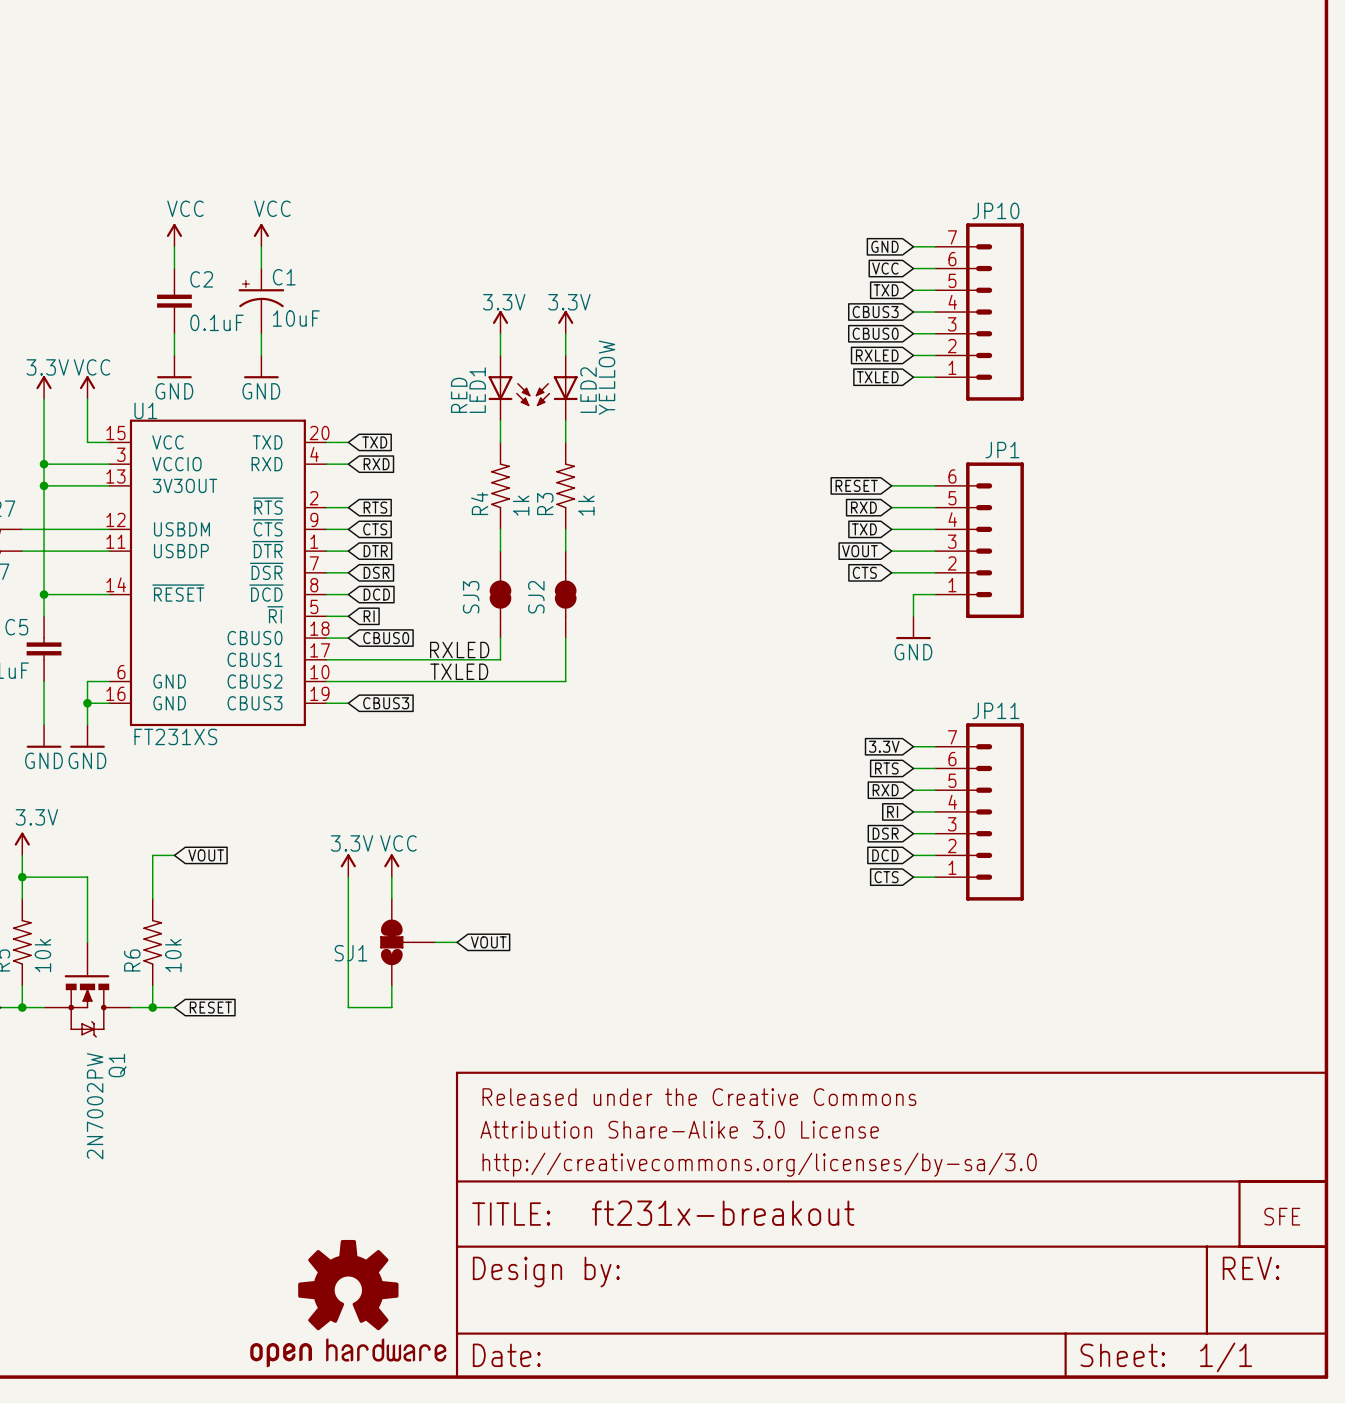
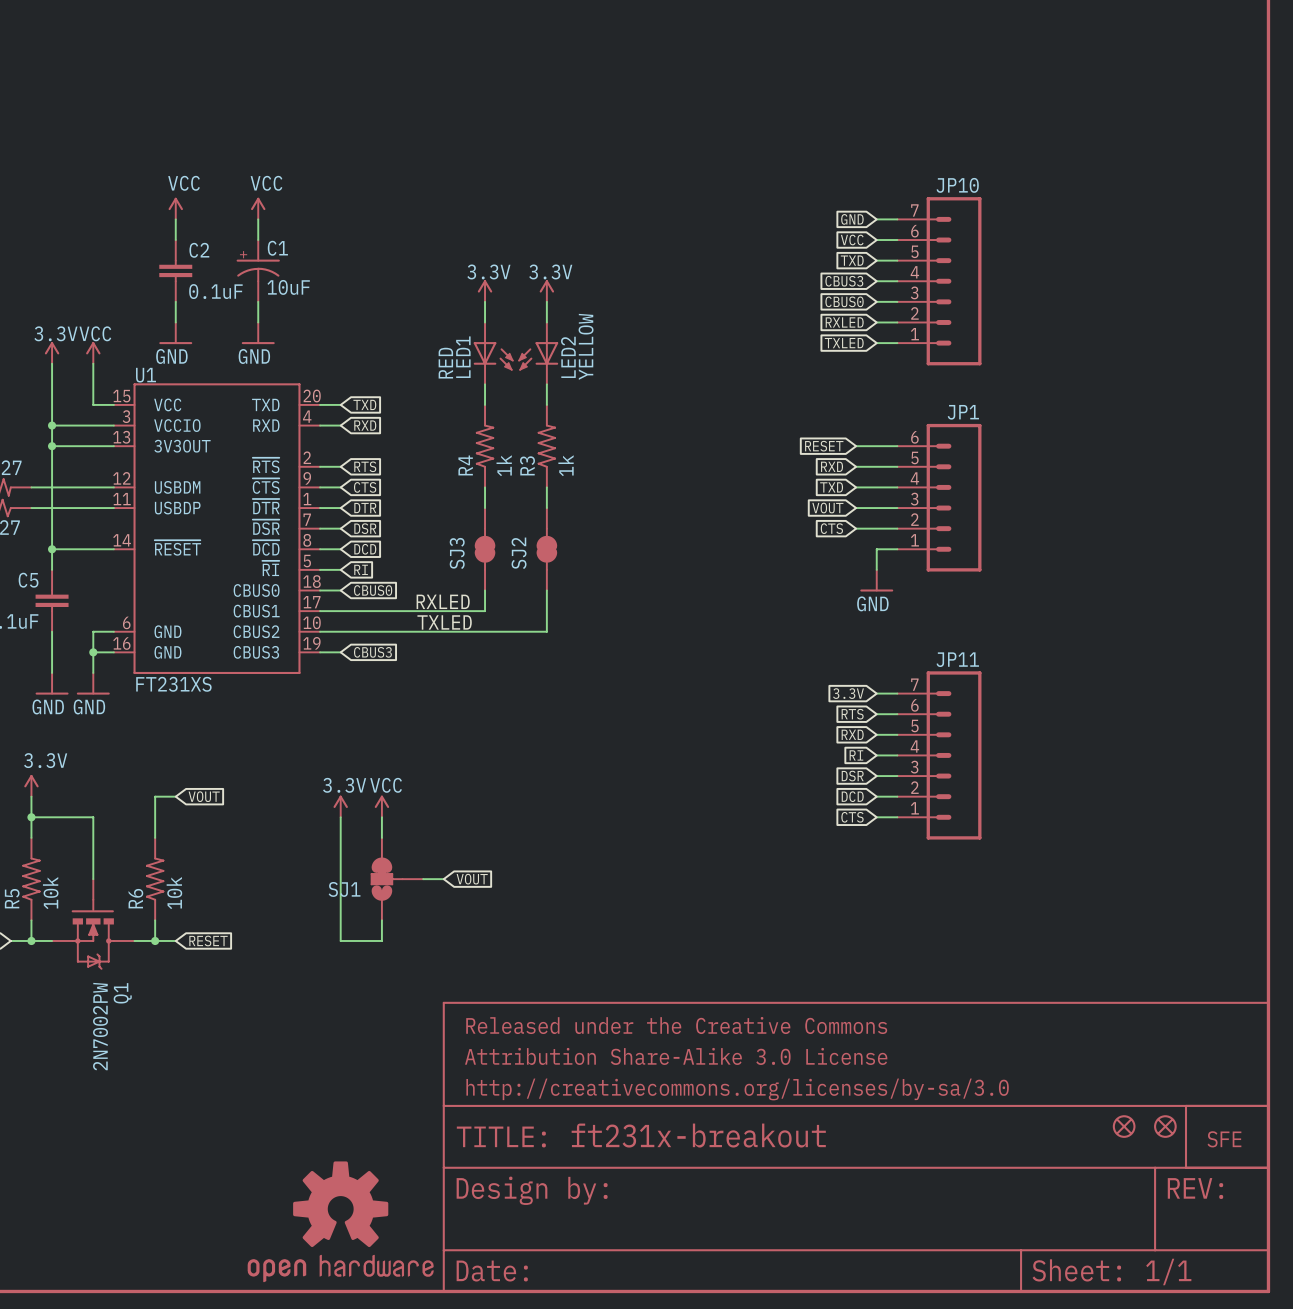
part: none -> (1124, 1126)
part: none -> (1165, 1126)

